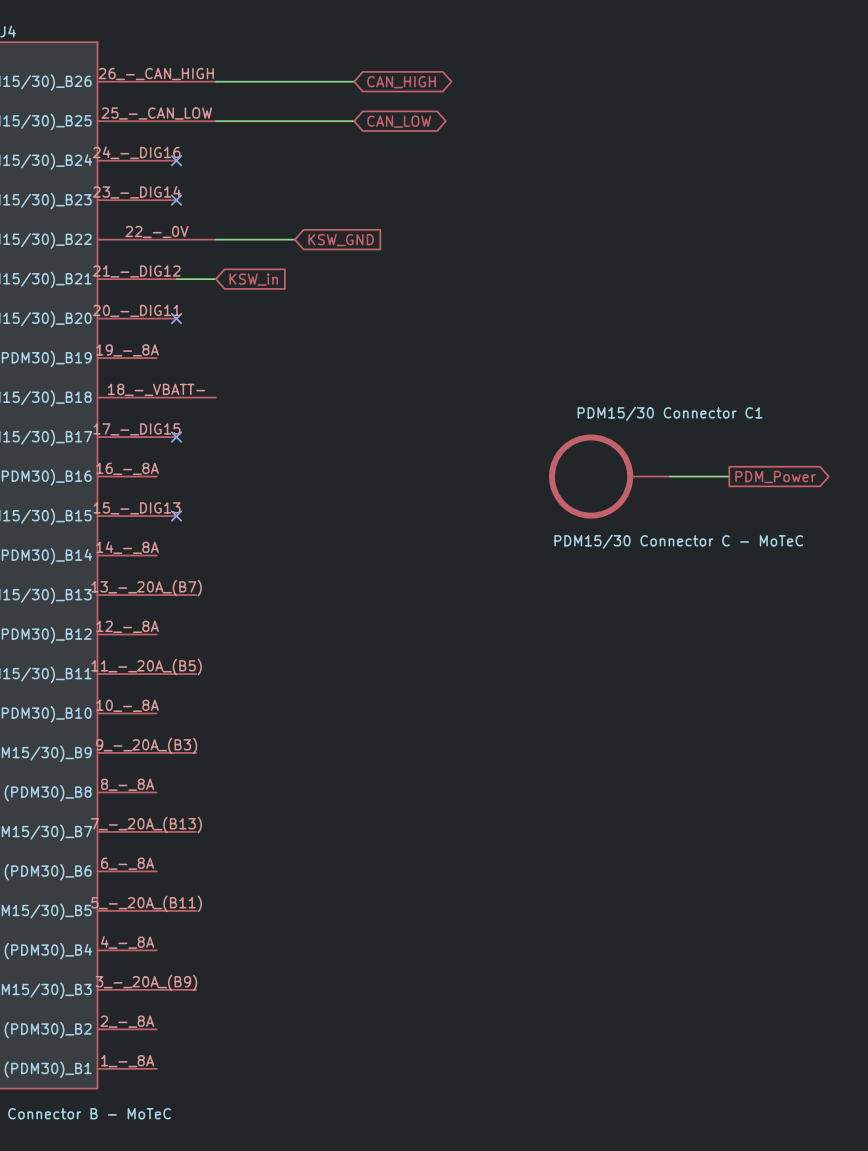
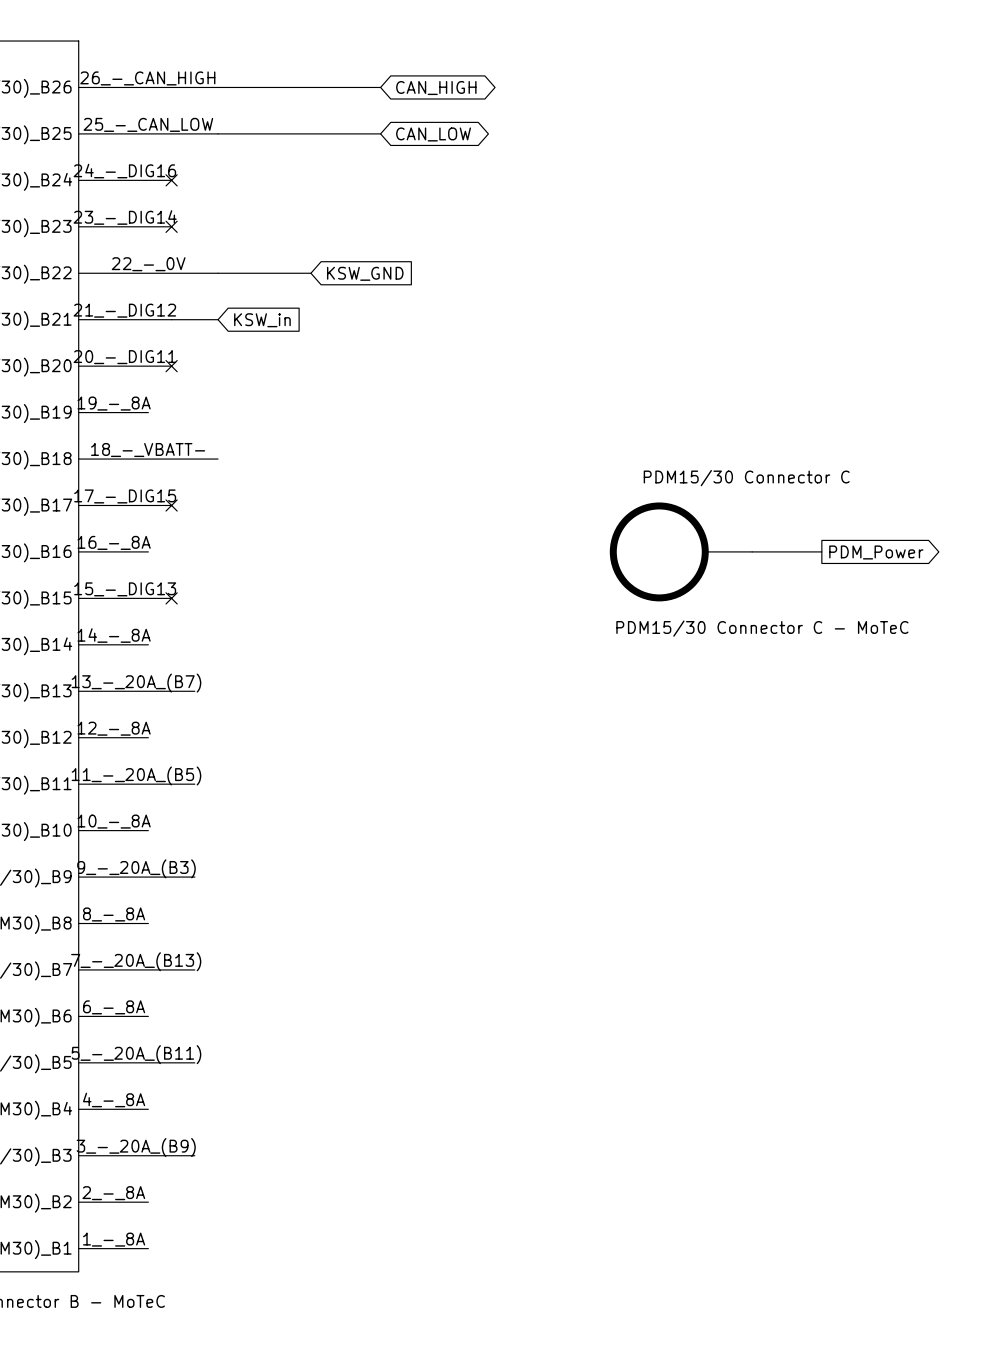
PDM15/30 Connector C1 name: PDM15/30 Connector C1 (670, 413) -> PDM15/30 Connector C (746, 478)

